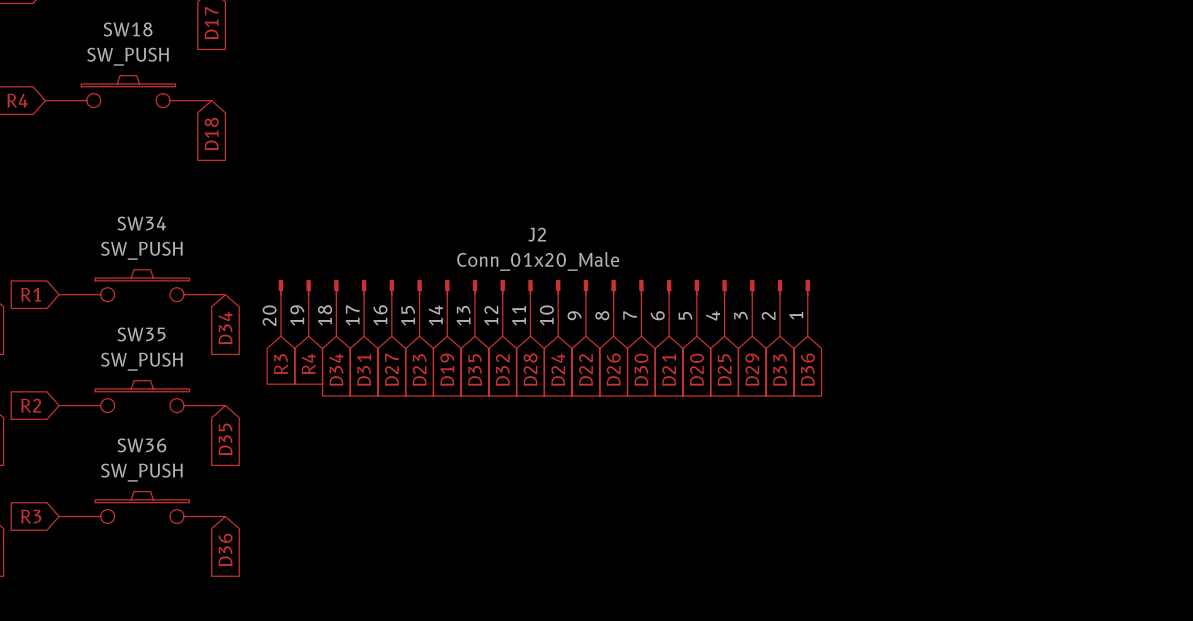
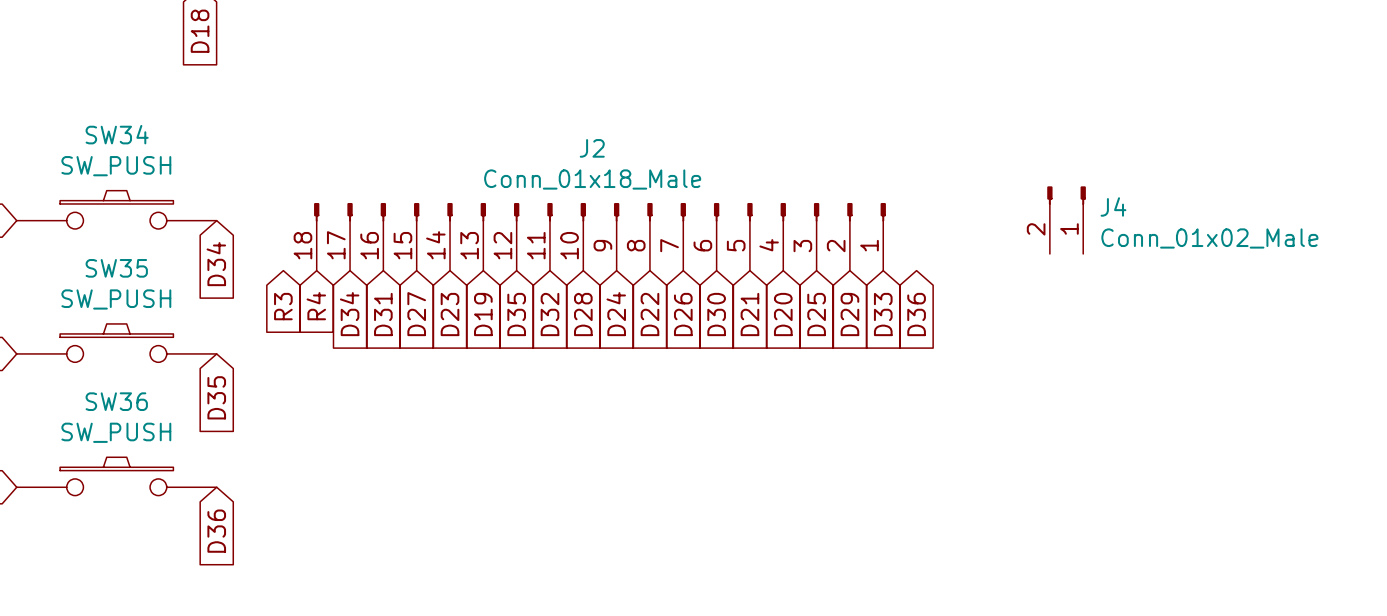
J2 value: Conn_01x20_Male (538, 261) -> Conn_01x18_Male (592, 179)
J2 symbol: [278, 280, 810, 337] -> [314, 202, 886, 271]
J4: none -> Conn_01x02_Male (1066, 220)

